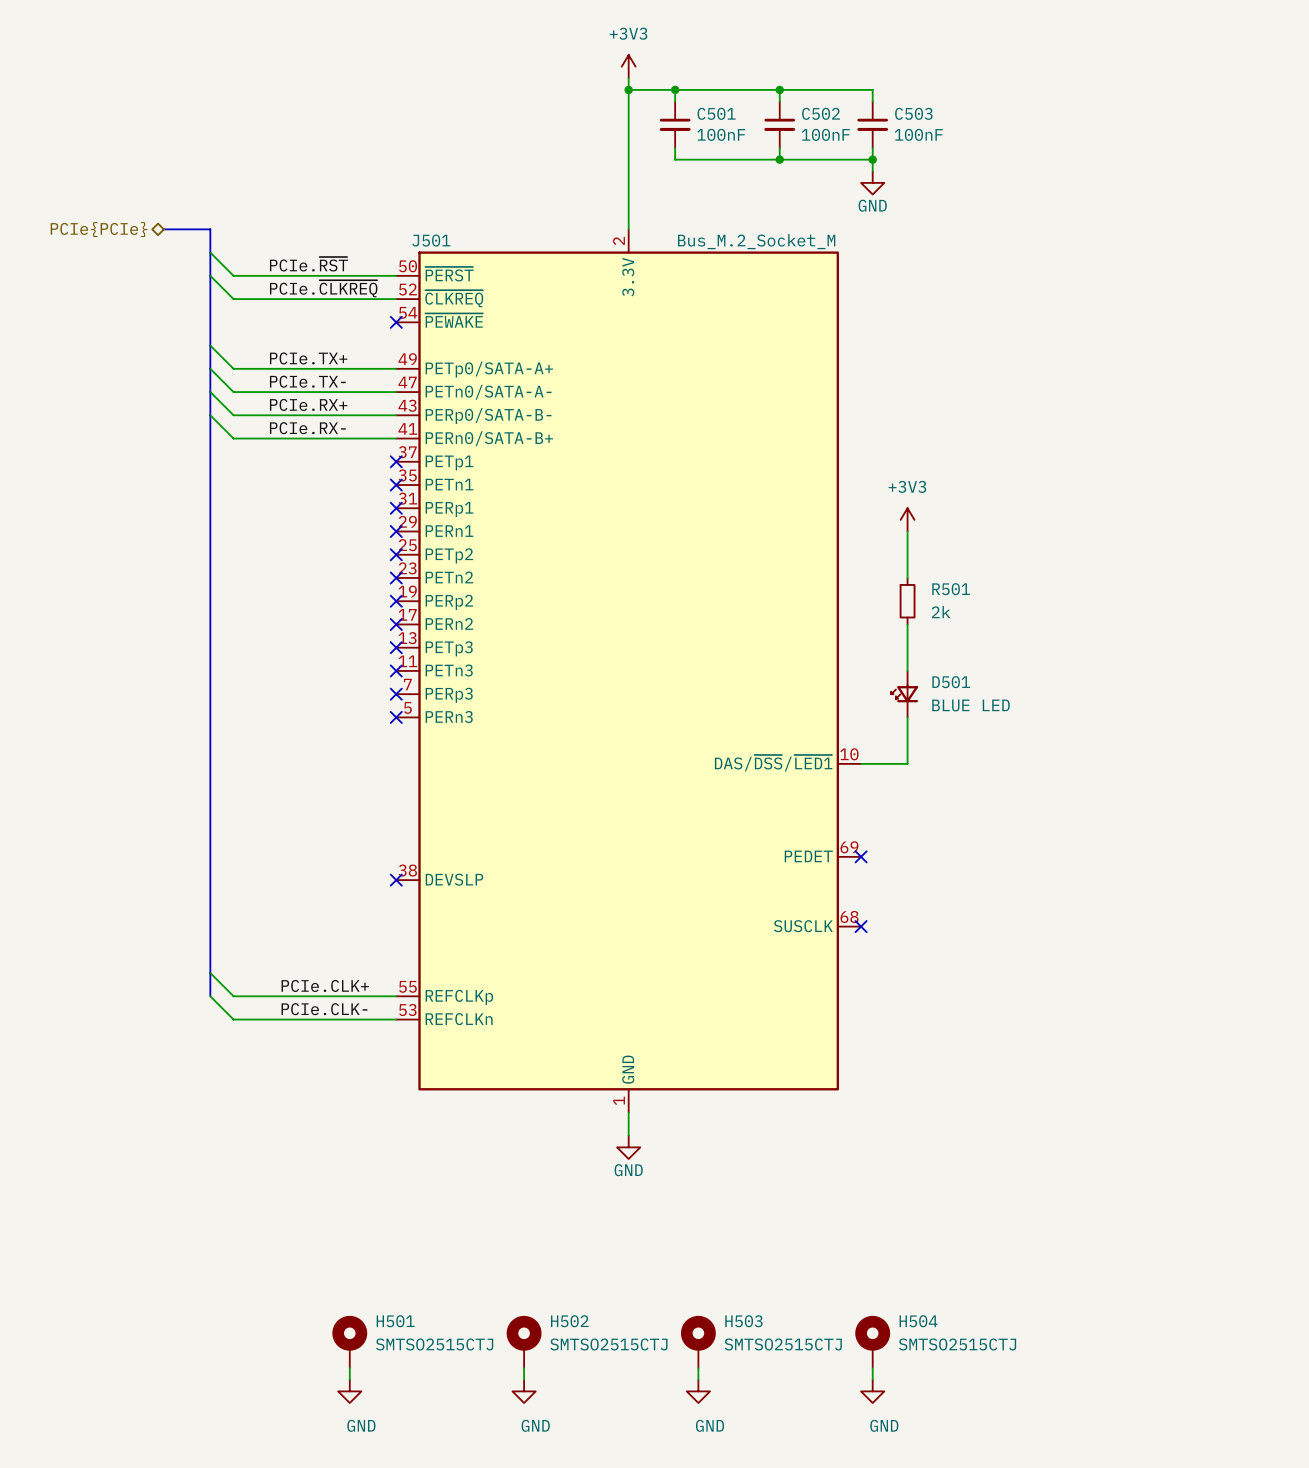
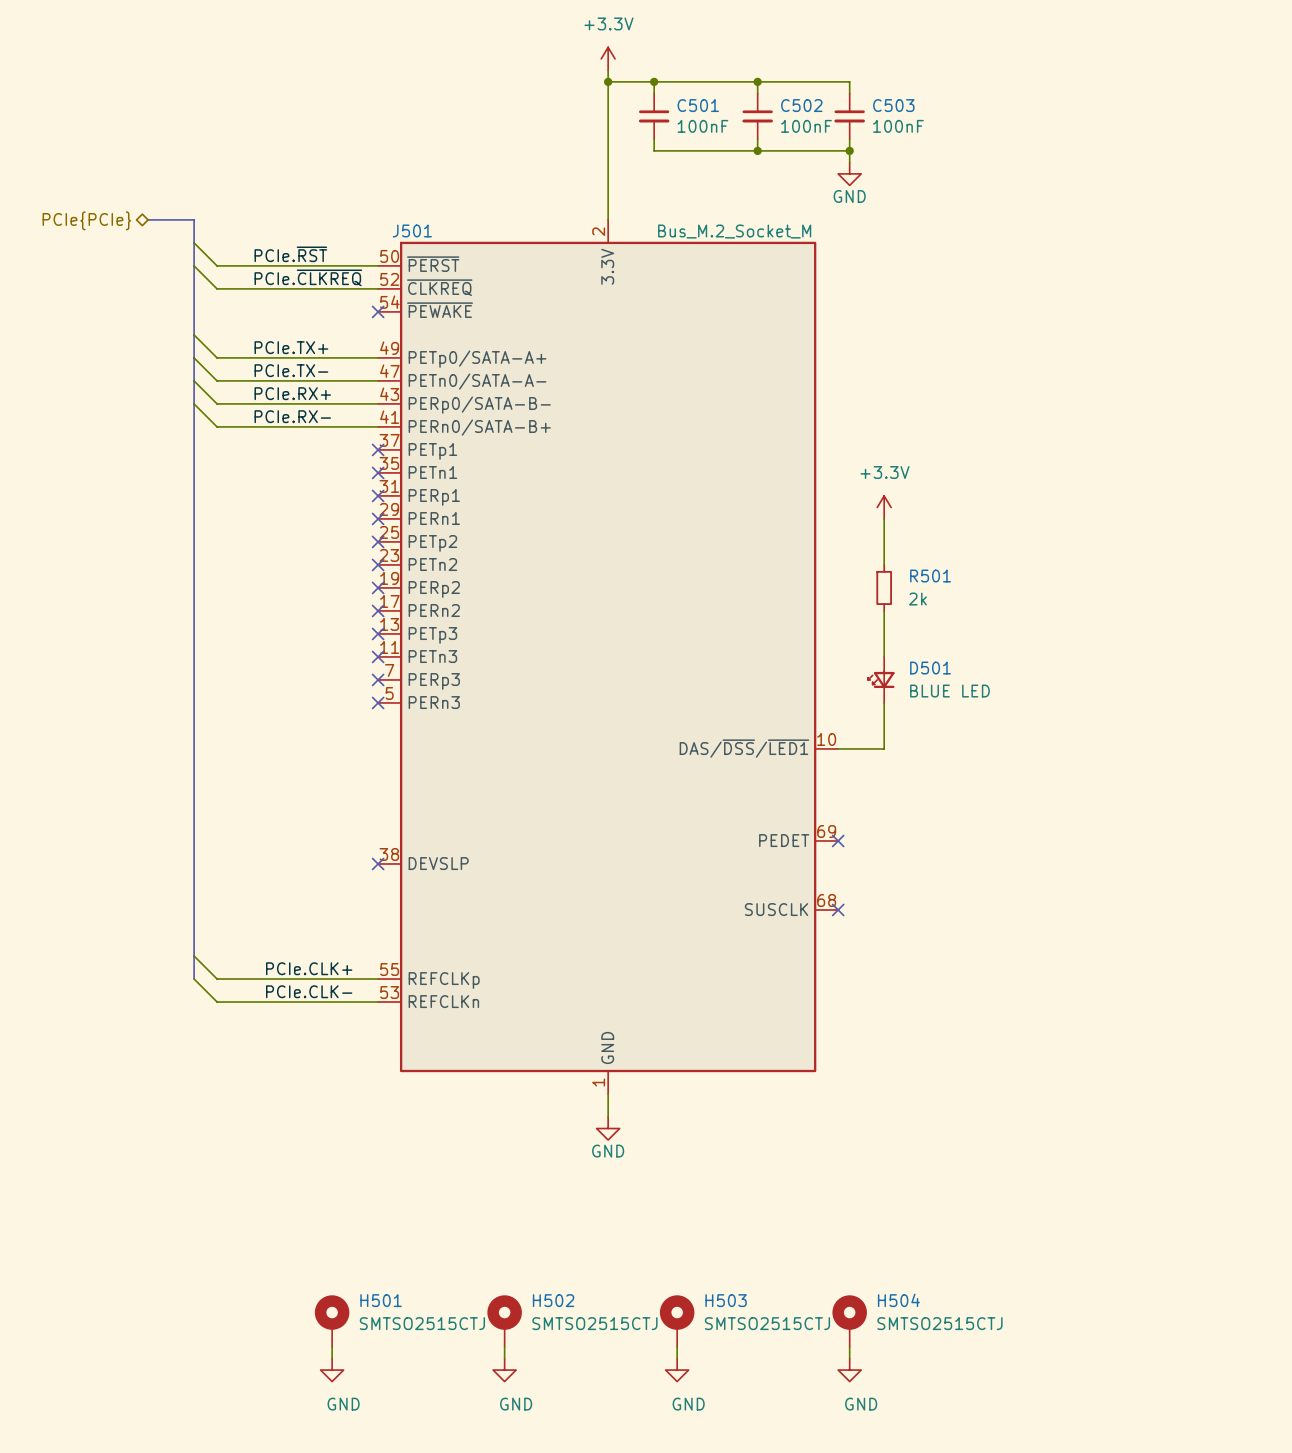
power symbol: +3V3 (628, 66) -> +3.3V (608, 58)
power symbol: +3V3 (907, 519) -> +3.3V (884, 507)

